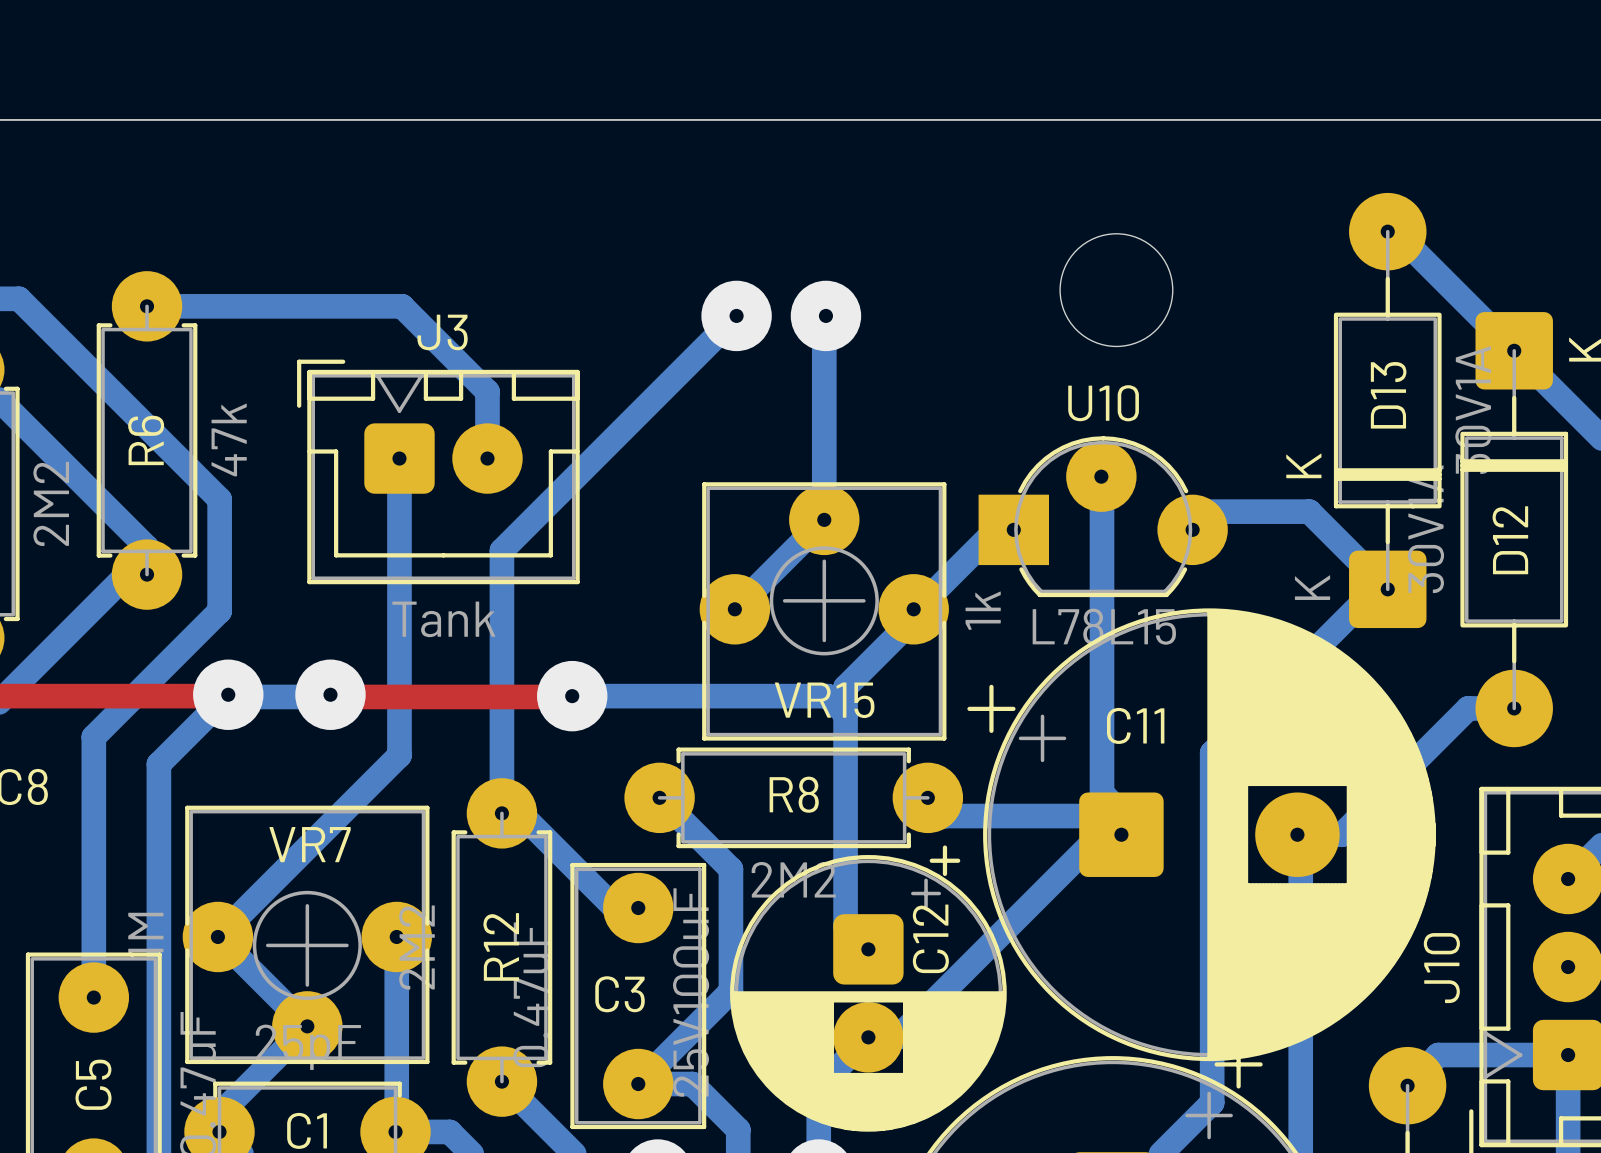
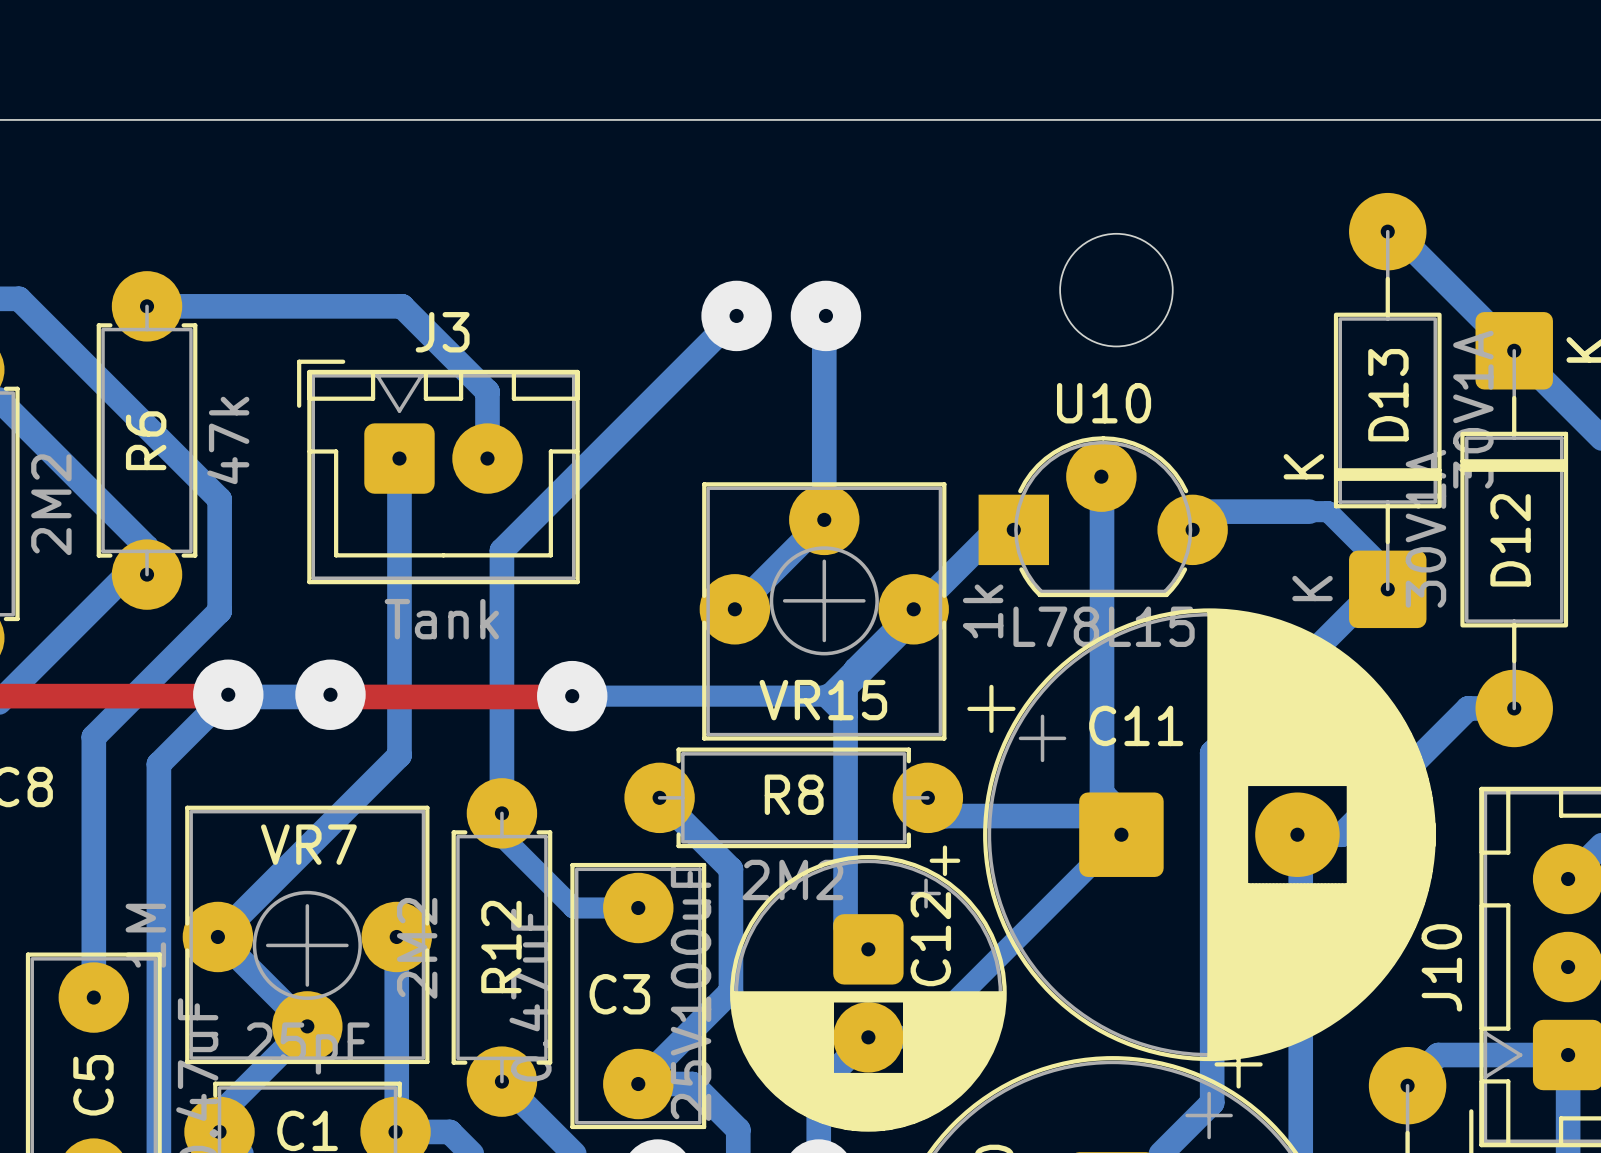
bottom track: (1309, 511) (1372, 574) (1390, 574) -> (1309, 511) (1328, 511) (1390, 574)
bottom track: (572, 696) (827, 696) -> (572, 696) (827, 696) (913, 609)
bottom track: (501, 813) (520, 813) (614, 908) -> (501, 813) (501, 836) (573, 908) (614, 908)
bottom track: (1121, 834) (1100, 834) (897, 1037) -> (1121, 834) (918, 1037) (897, 1037)

